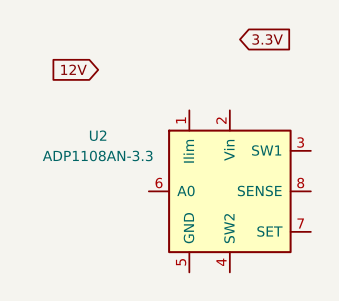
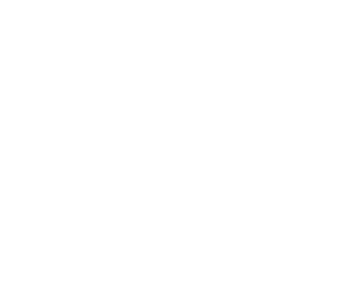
global label: 3.3V (267, 39) -> none
global label: 12V (73, 69) -> none
U2: ADP1108AN-3.3 (229, 191) -> none

